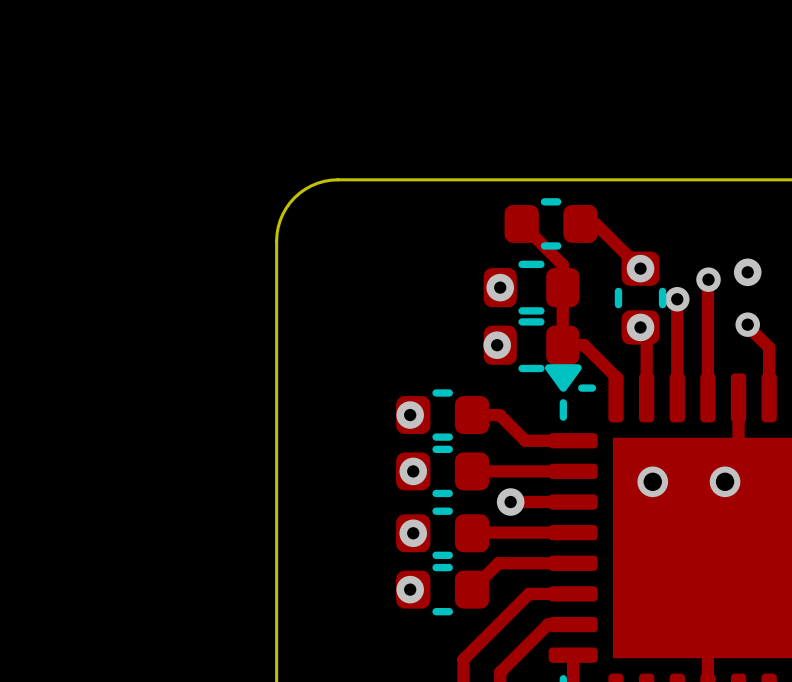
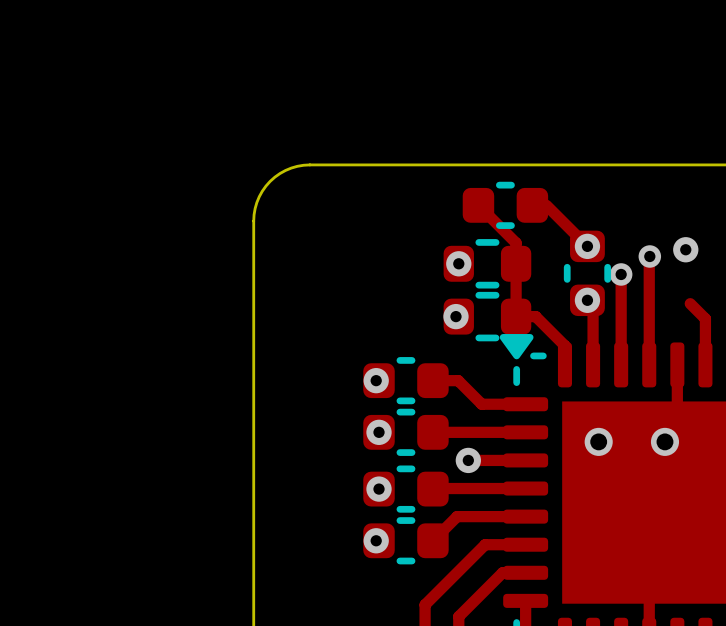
via: (747, 324) -> none

